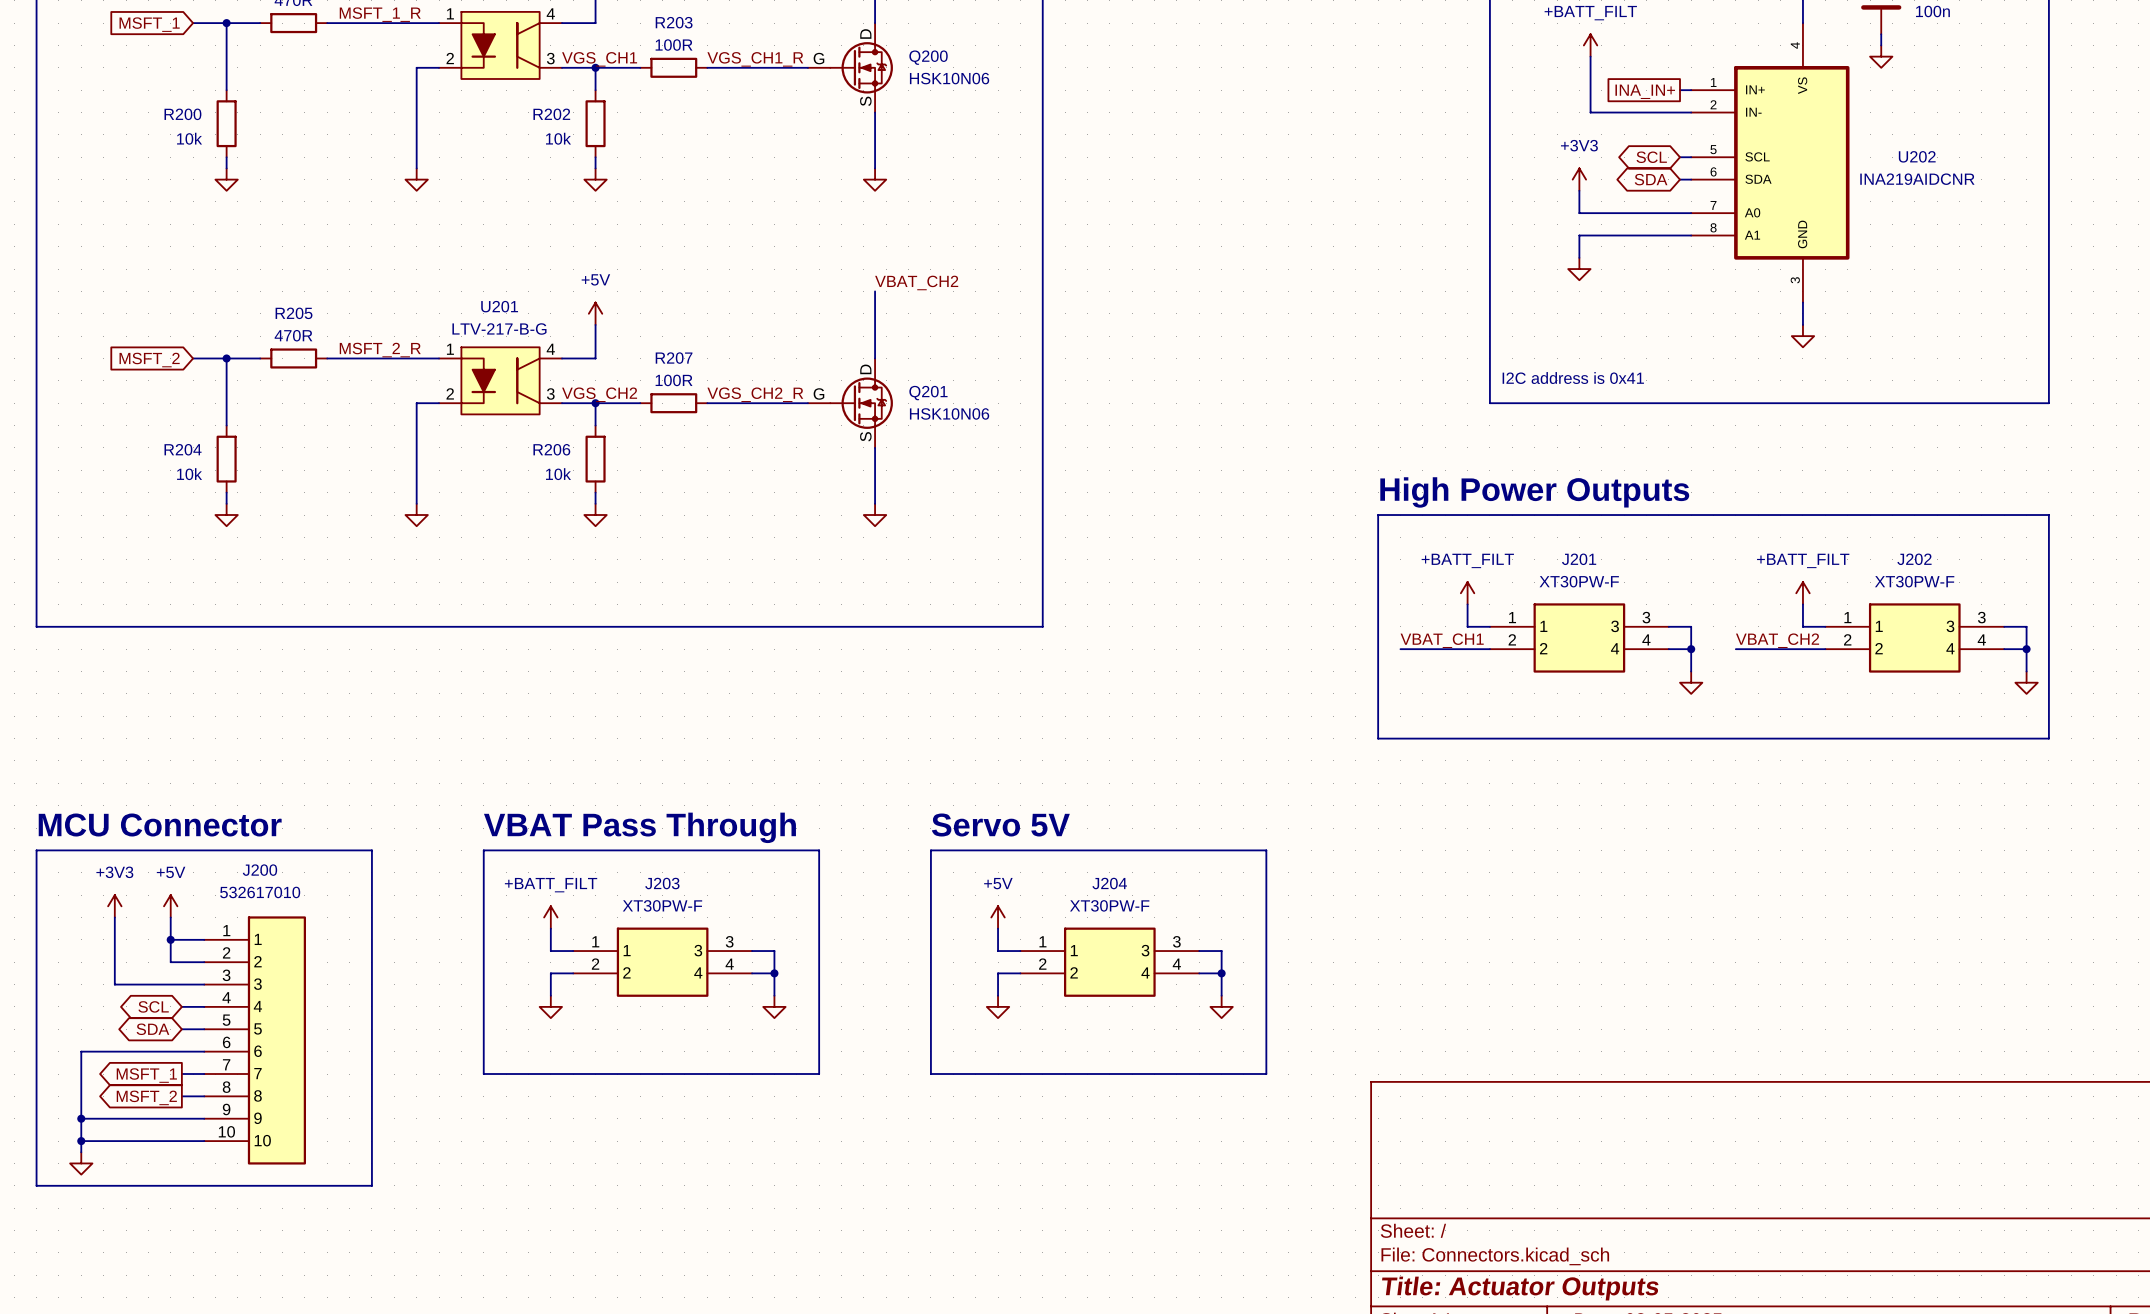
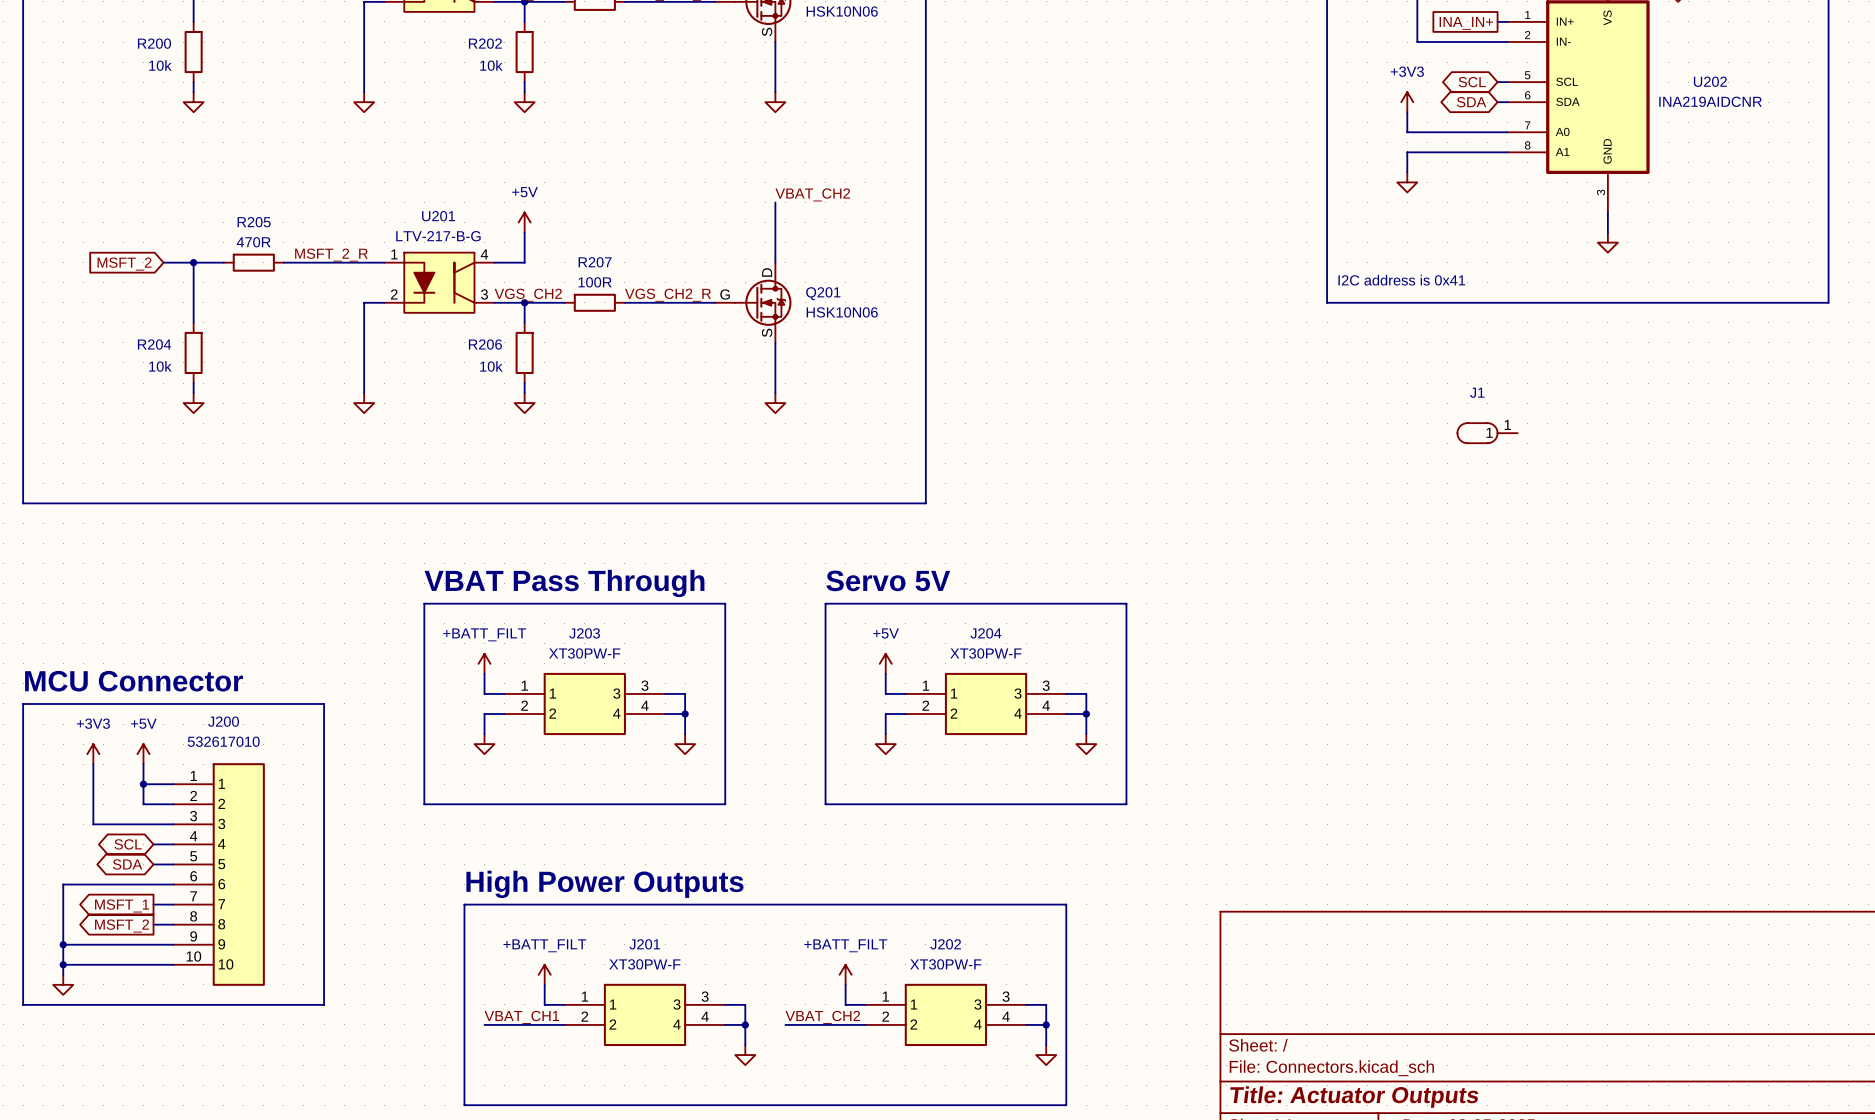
text: High Power Outputs (1534, 492) -> none
line: (1378, 515) (2048, 515) (2048, 738) (1378, 738) (1378, 515) -> none
J1: none -> (1487, 433)
power symbol: +BATT_FILT (1467, 593) -> none
power symbol: +BATT_FILT (1802, 593) -> none
wire: (1467, 604) (1467, 626) (1489, 626) -> none
wire: (1802, 604) (1802, 626) (1825, 626) -> none
wire: (1668, 626) (1691, 626) (1691, 671) -> none
wire: (2004, 626) (2026, 626) (2026, 671) -> none
J201 position: (1579, 637) -> (645, 1014)
J202 position: (1914, 637) -> (945, 1014)
label: VBAT_CH1 (1442, 640) -> none
label: VBAT_CH2 (1777, 640) -> none
wire: (1400, 649) (1489, 649) -> none
wire: (1668, 649) (1691, 649) -> none
junction: (1691, 649) -> none
wire: (1735, 649) (1825, 649) -> none
wire: (2004, 649) (2026, 649) -> none
junction: (2026, 649) -> none
power symbol: (1691, 682) -> none
power symbol: (2026, 682) -> none
text position: Servo 5V (1000, 825) -> Servo 5V (888, 580)
text position: VBAT Pass Through (639, 827) -> VBAT Pass Through (564, 583)
line: (483, 850) (819, 850) -> (424, 703) (424, 603) (725, 603) (725, 703)
line: (930, 850) (1266, 850) -> (825, 703) (825, 603) (1126, 603) (1126, 703)
junction: none -> (685, 714)
junction: none -> (1086, 714)
power symbol position: +BATT_FILT (550, 917) -> +BATT_FILT (484, 663)
power symbol position: +5V (998, 917) -> +5V (885, 663)
wire: (550, 928) (550, 951) (573, 951) -> (484, 673) (484, 693) (504, 693)
wire: (998, 928) (998, 951) (1020, 951) -> (885, 673) (885, 693) (905, 693)
wire: (752, 951) (774, 951) (774, 995) -> (665, 693) (685, 693) (685, 734)
wire: (1199, 951) (1221, 951) (1221, 995) -> (1066, 693) (1086, 693) (1086, 734)
line: (483, 962) (483, 1074) (528, 1074) -> (424, 804) (725, 804)
J203 position: (662, 962) -> (584, 703)
line: (819, 962) (819, 1074) -> (825, 904) (725, 904)
line: (930, 962) (930, 1074) -> none
J204 position: (1109, 962) -> (986, 703)
line: (1266, 962) (1266, 1074) (1199, 1074) -> (1126, 804) (825, 804)
wire: (573, 973) (550, 973) (550, 995) -> (504, 714) (484, 714) (484, 734)
wire: (752, 973) (774, 973) -> (665, 714) (685, 714)
junction: (774, 973) -> none
wire: (1020, 973) (998, 973) (998, 995) -> (905, 714) (885, 714) (885, 734)
wire: (1199, 973) (1221, 973) -> (1066, 714) (1086, 714)
junction: (1221, 973) -> none
power symbol position: (550, 1006) -> (484, 744)
power symbol position: (774, 1006) -> (685, 744)
power symbol position: (998, 1006) -> (885, 744)
power symbol position: (1221, 1006) -> (1086, 744)
text: none -> High Power Outputs (604, 884)
line: none -> (464, 904) (464, 1105) (1066, 1105) (1066, 904)
power symbol: none -> +BATT_FILT (544, 974)
power symbol: none -> +BATT_FILT (845, 974)
wire: none -> (544, 984) (544, 1004) (564, 1004)
wire: none -> (845, 984) (845, 1004) (865, 1004)
wire: none -> (725, 1004) (745, 1004) (745, 1045)
wire: none -> (1026, 1004) (1046, 1004) (1046, 1045)
label: none -> VBAT_CH1 (521, 1017)
label: none -> VBAT_CH2 (822, 1017)
wire: none -> (484, 1024) (564, 1024)
wire: none -> (725, 1024) (745, 1024)
junction: none -> (745, 1024)
wire: none -> (785, 1024) (865, 1024)
wire: none -> (1026, 1024) (1046, 1024)
junction: none -> (1046, 1024)
power symbol: none -> (745, 1055)
power symbol: none -> (1046, 1055)

